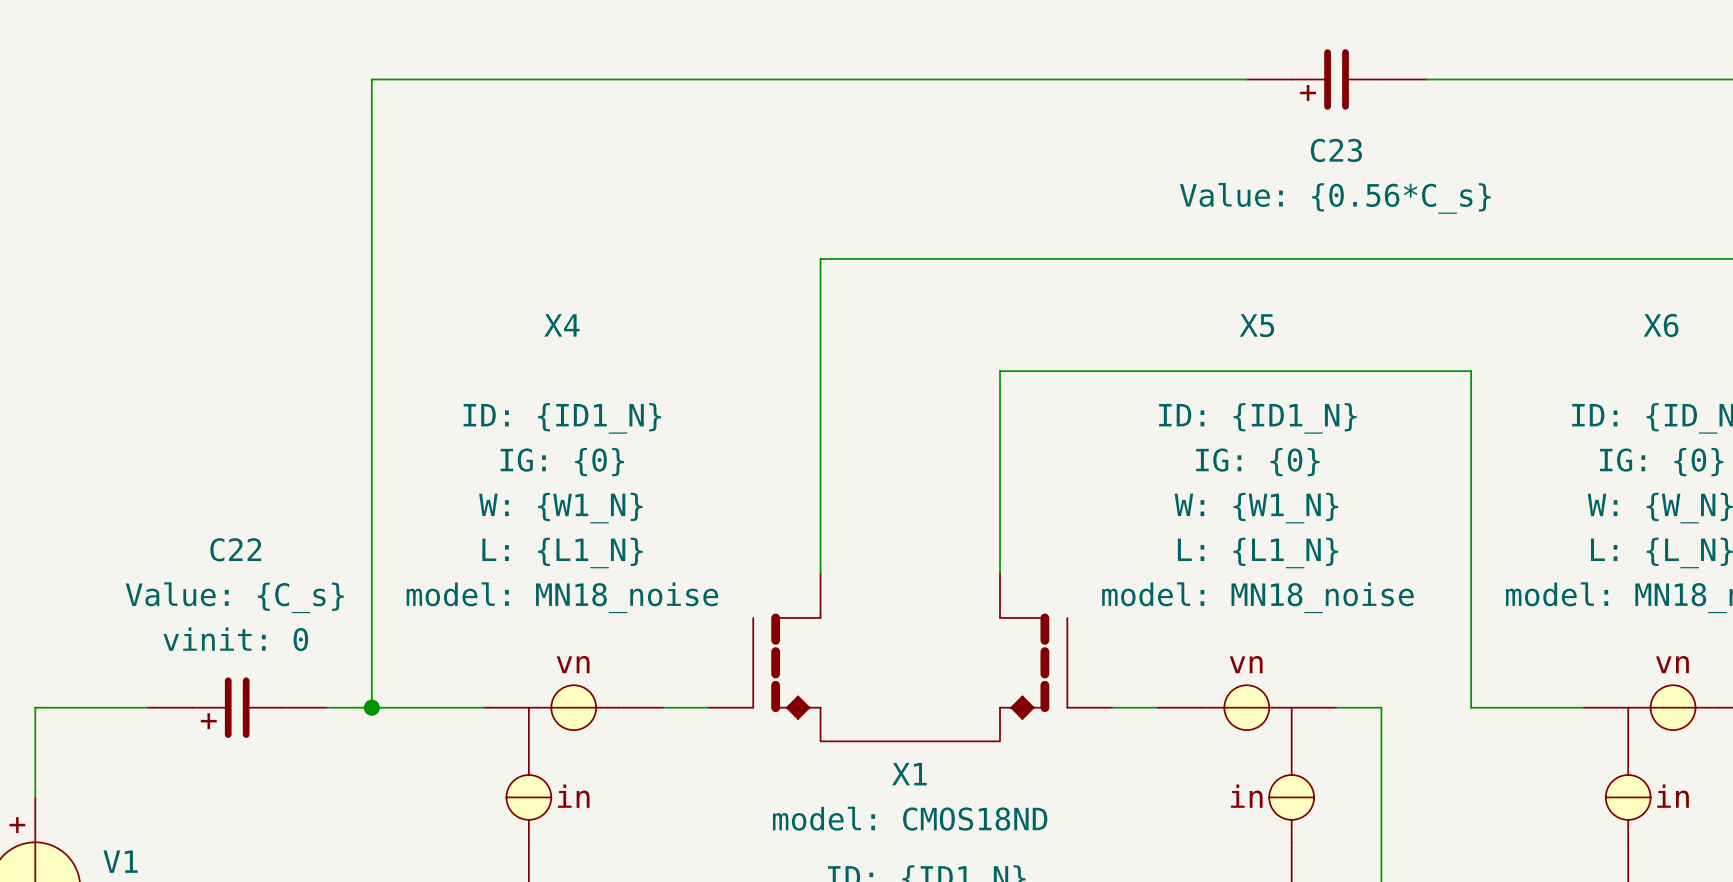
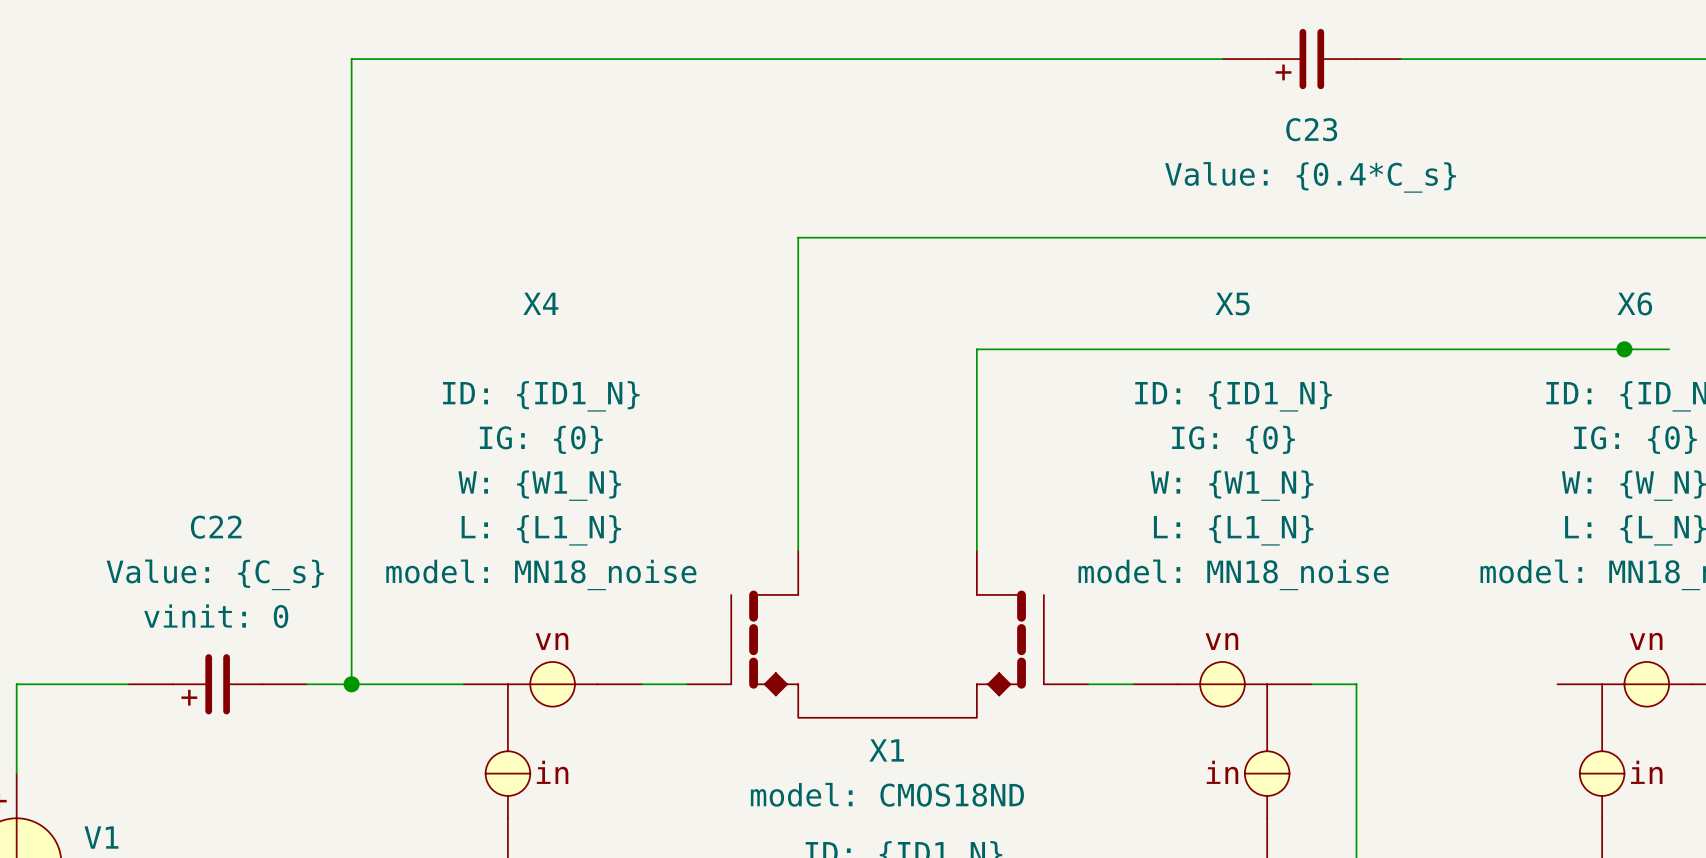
C23 value: Value: {0.56*C_s} (1335, 198) -> Value: {0.4*C_s} (1310, 177)
wire: (1471, 371) (1471, 707) (1583, 707) -> (1445, 349) (1669, 349)
junction: none -> (1624, 349)

